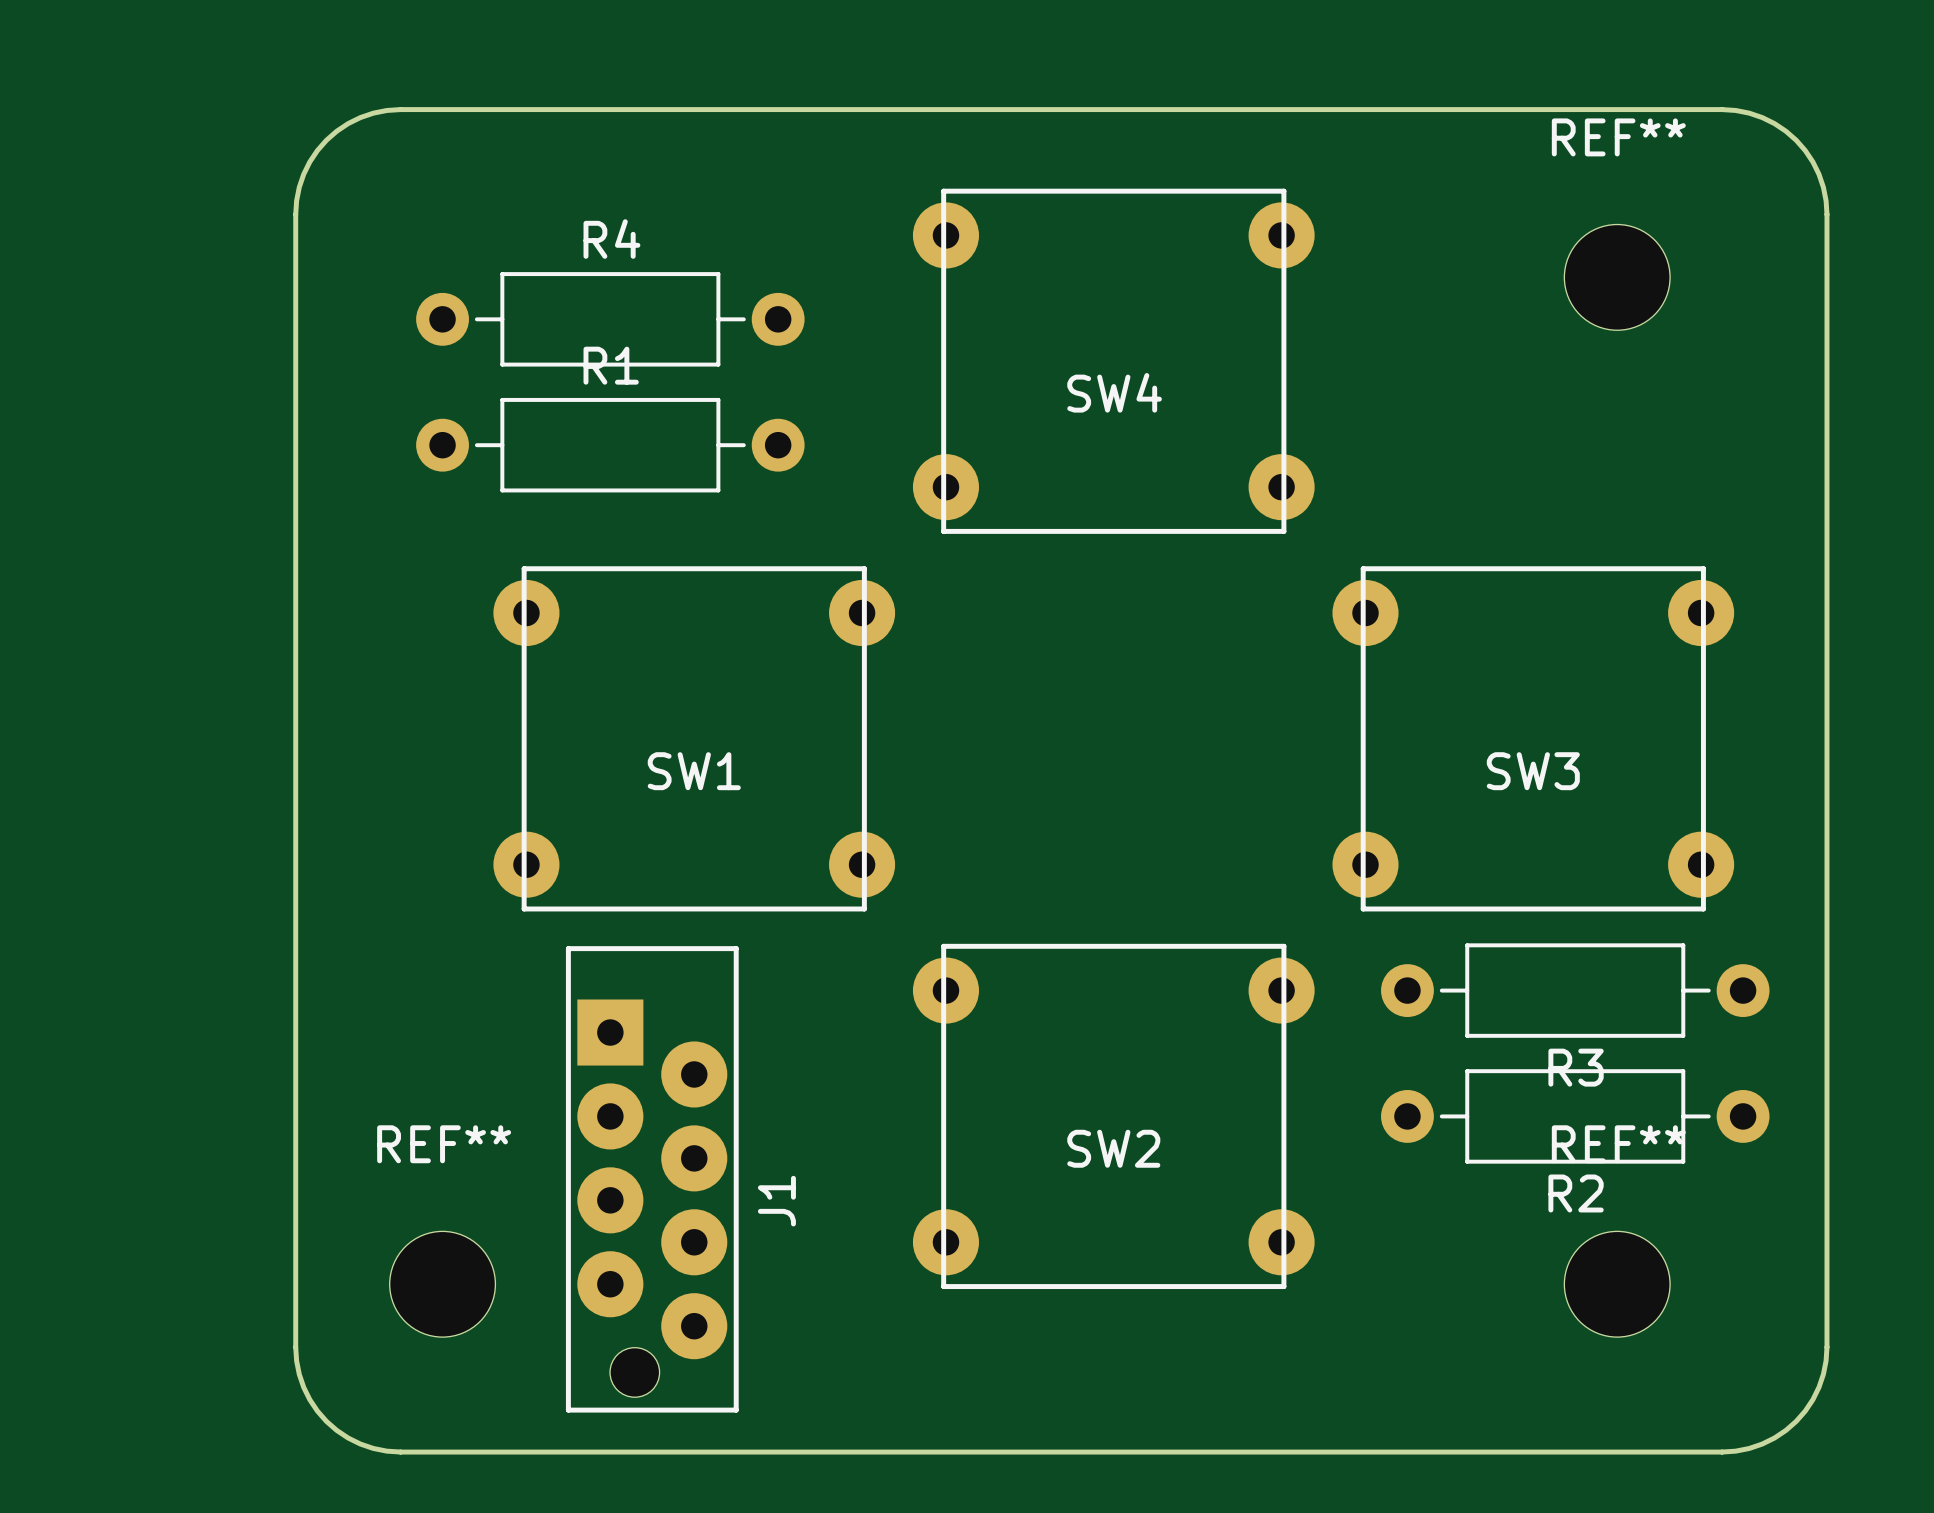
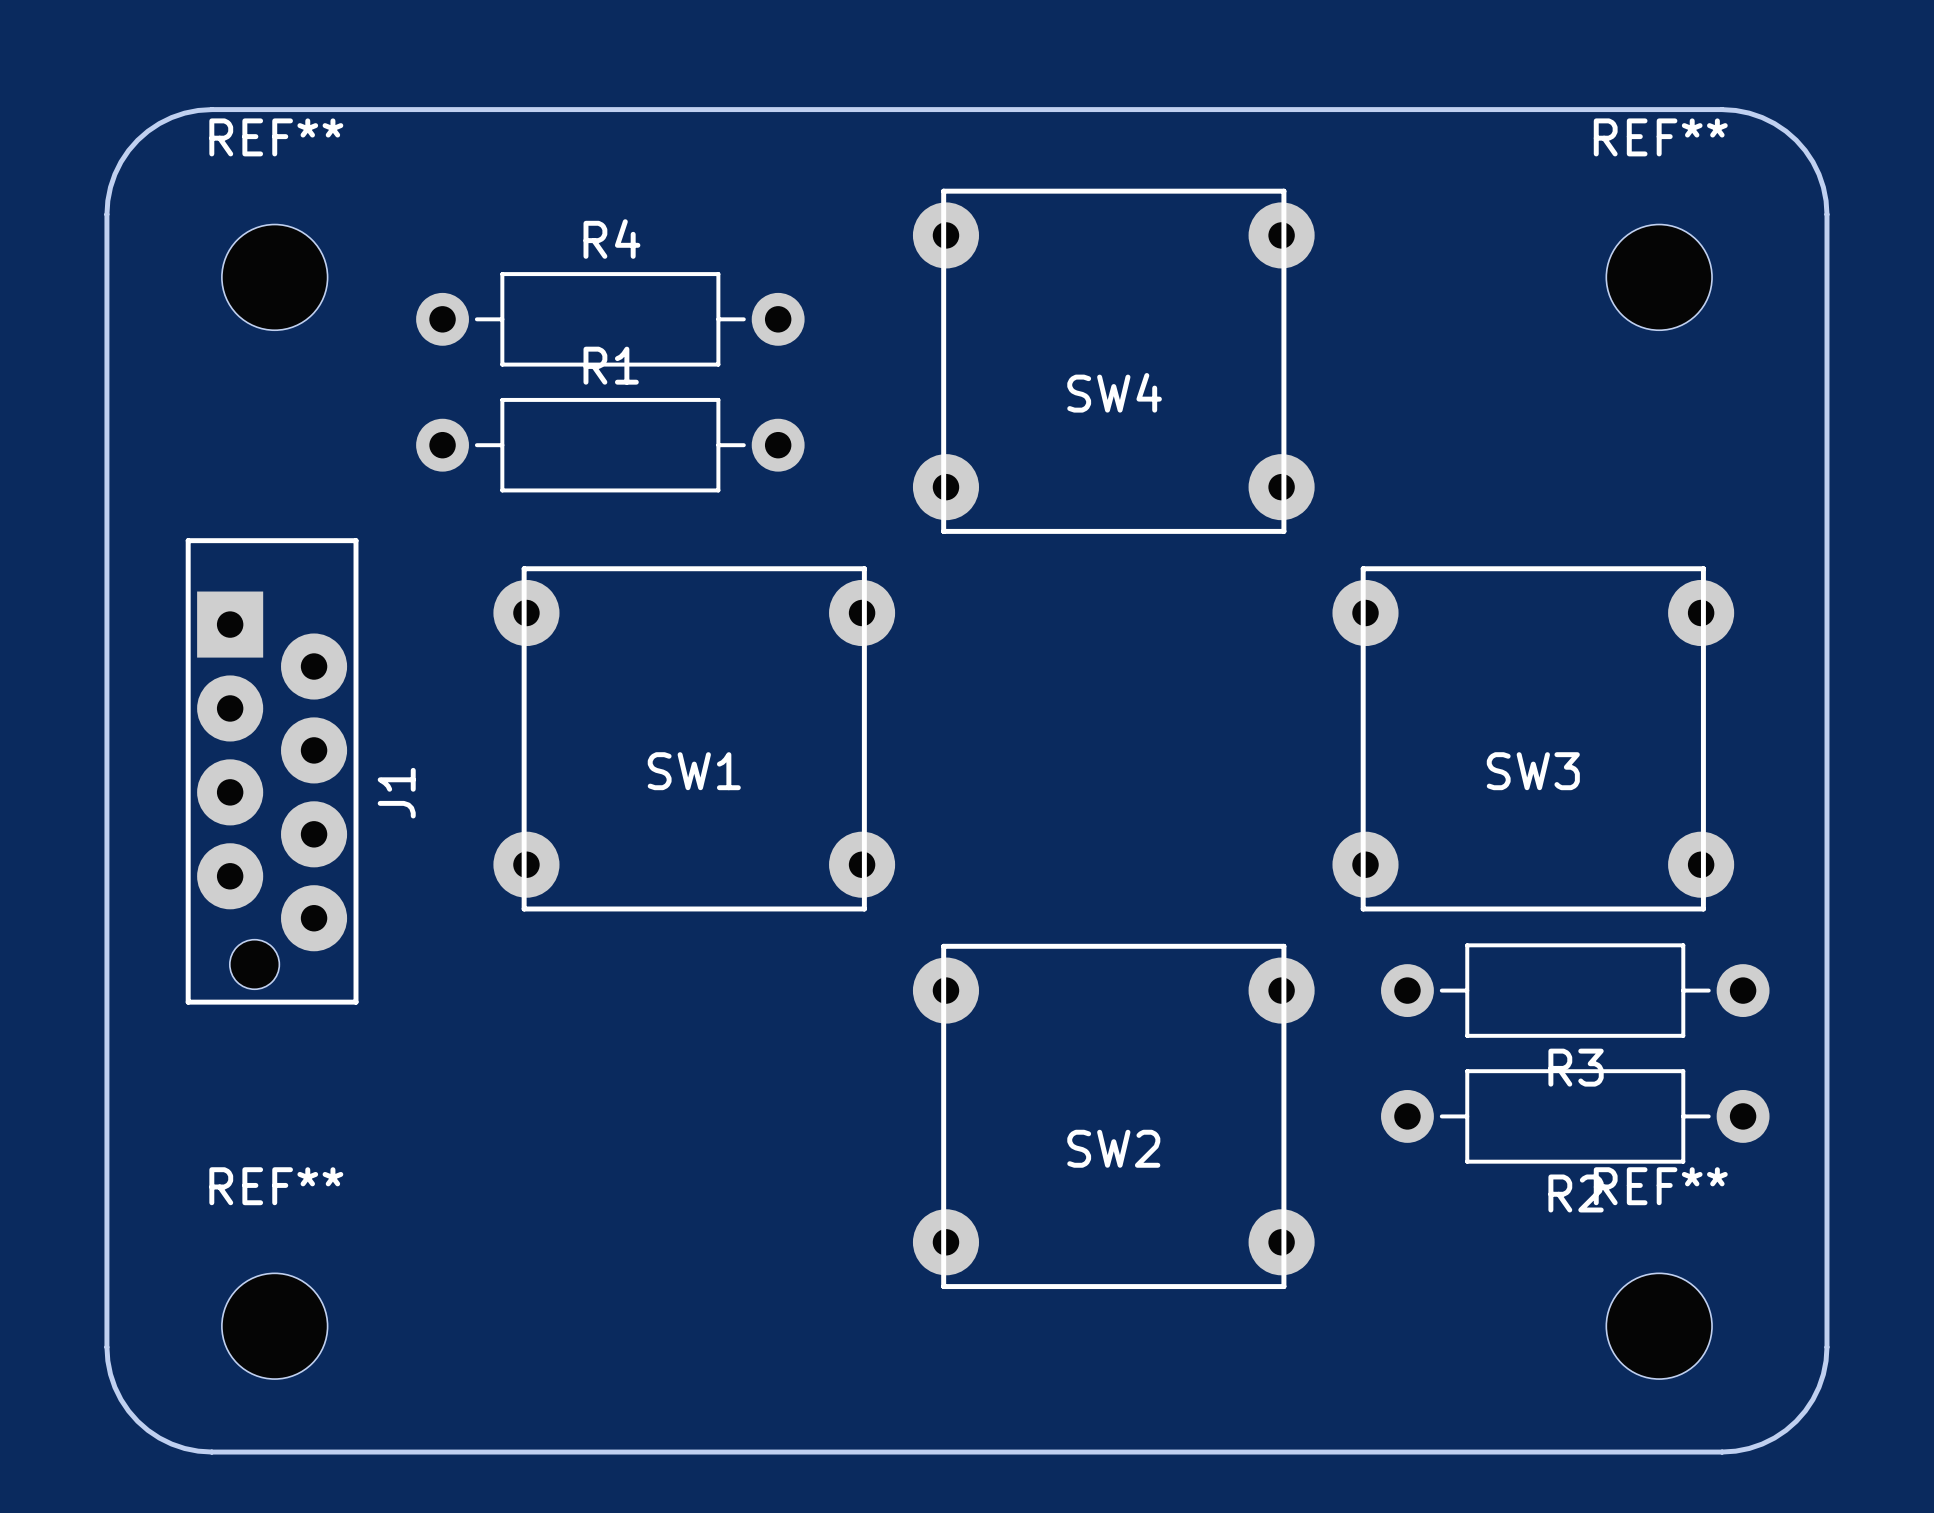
board edge: (400, 109) (373, 113) (360, 117) (336, 131) (326, 140) (309, 162) (303, 174) (296, 200) (295, 214) -> none
board edge: (295, 214) (296, 1360) (303, 1387) (309, 1399) (326, 1421) (348, 1438) (360, 1444) (373, 1448) (400, 1452) -> (400, 109) (211, 109) (184, 113) (159, 123) (137, 140) (120, 162) (110, 187) (106, 214) (106, 1347) (110, 1374) (114, 1387) (128, 1411) (147, 1430) (171, 1444) (184, 1448) (211, 1452) (400, 1452)
REF**: none -> (274, 277)
REF** position: (1617, 277) -> (1659, 277)
J1 position: (652, 1179) -> (272, 771)
REF** position: (442, 1284) -> (274, 1326)
REF** position: (1617, 1284) -> (1659, 1326)

